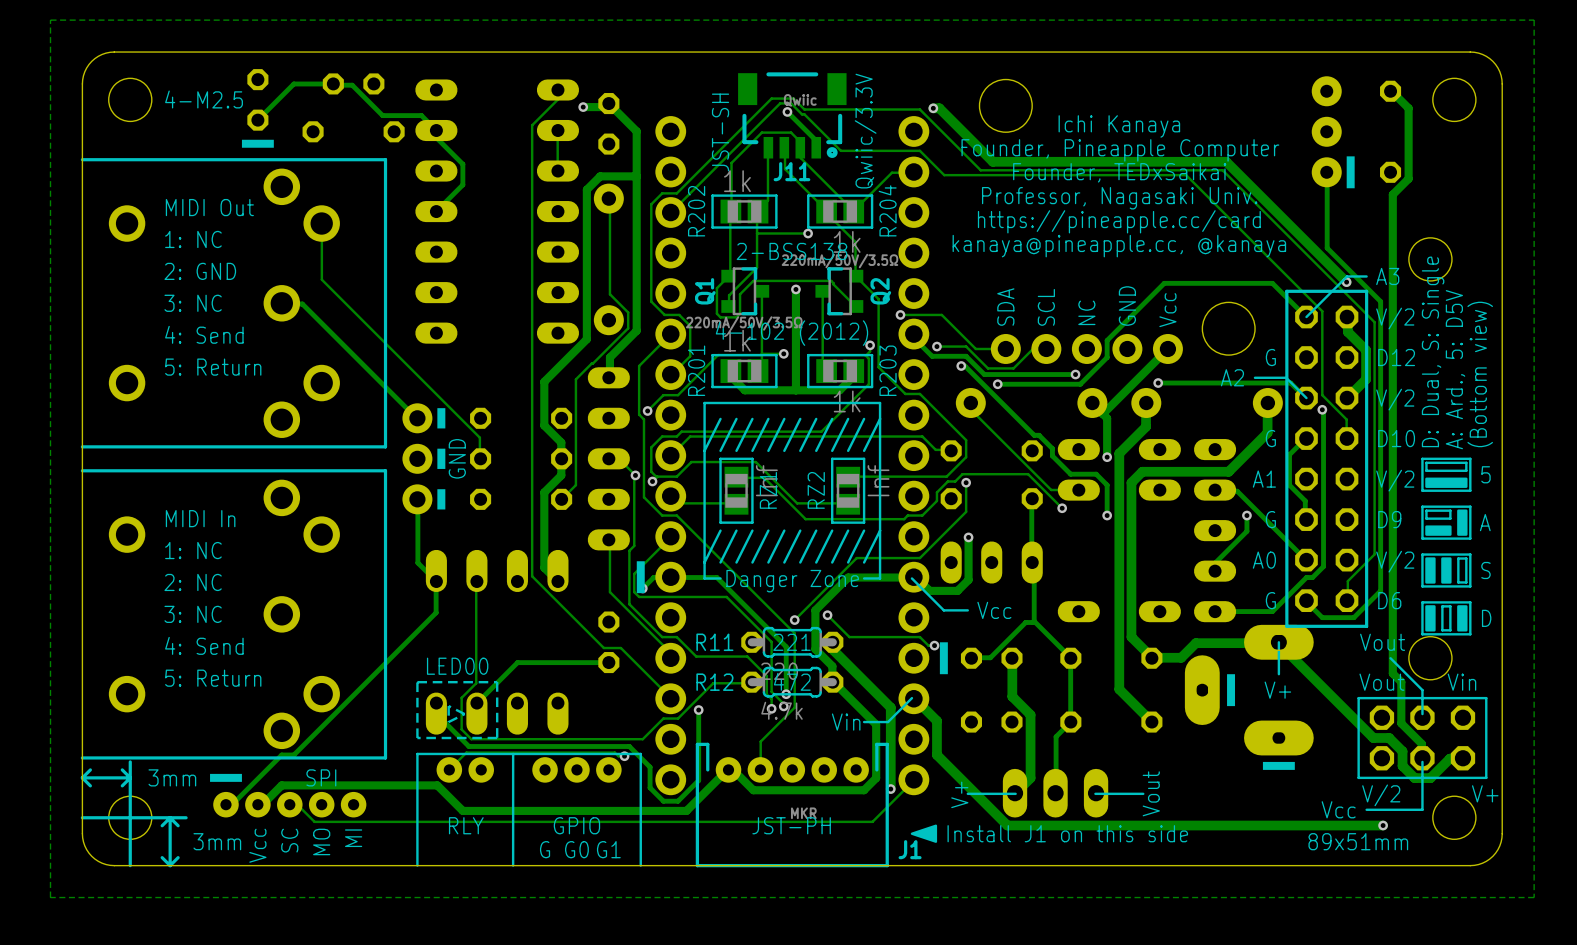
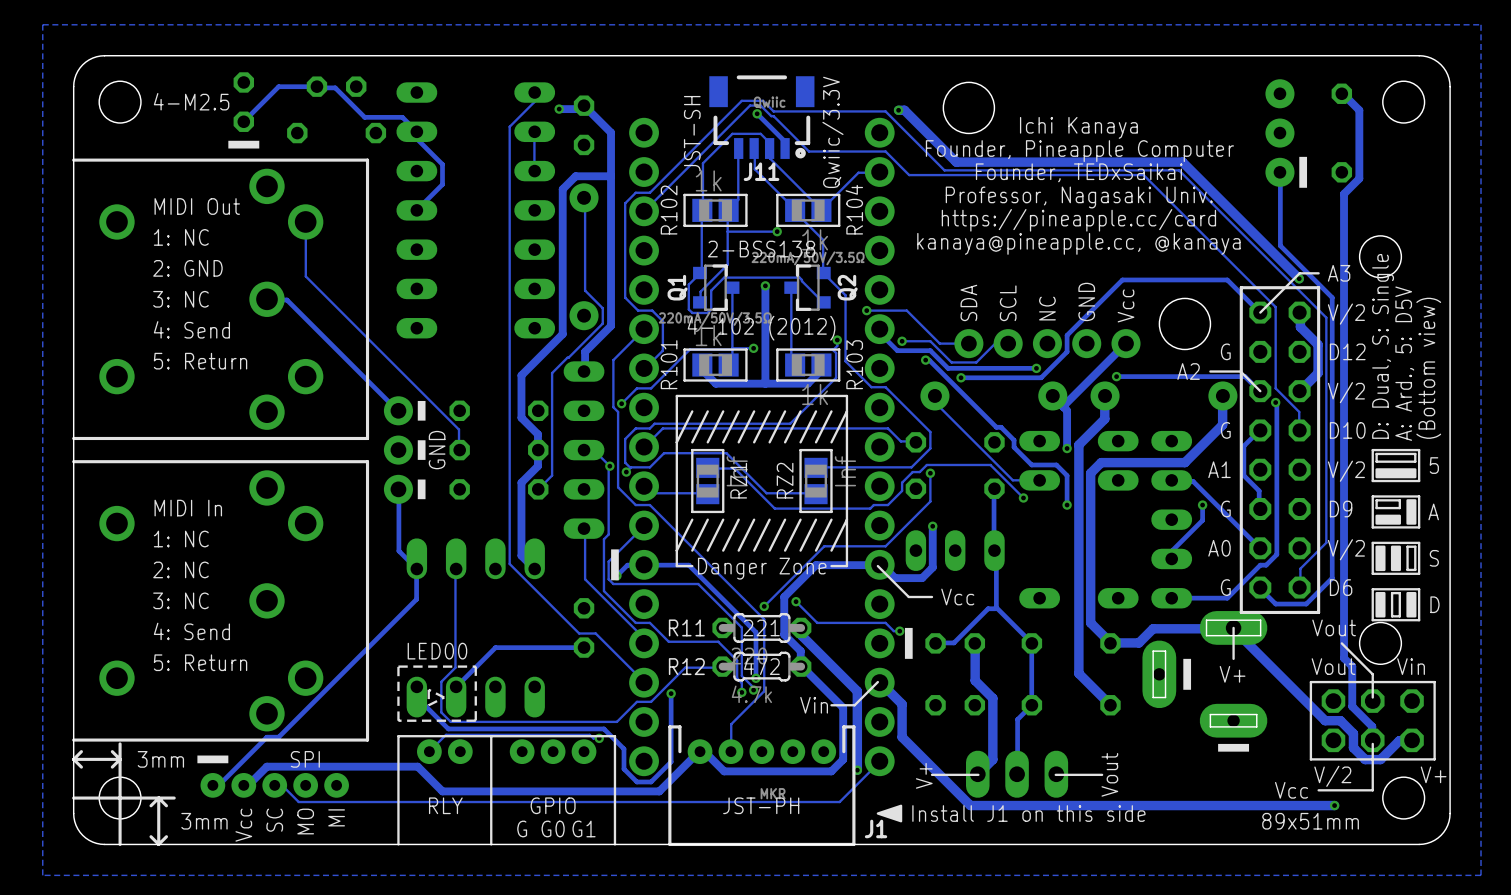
R204 name: R204 (887, 210) -> R104 (854, 209)
R202 name: R202 (696, 211) -> R102 (669, 210)
R201 name: R201 (696, 370) -> R101 (669, 364)
R203 name: R203 (888, 370) -> R103 (854, 364)

